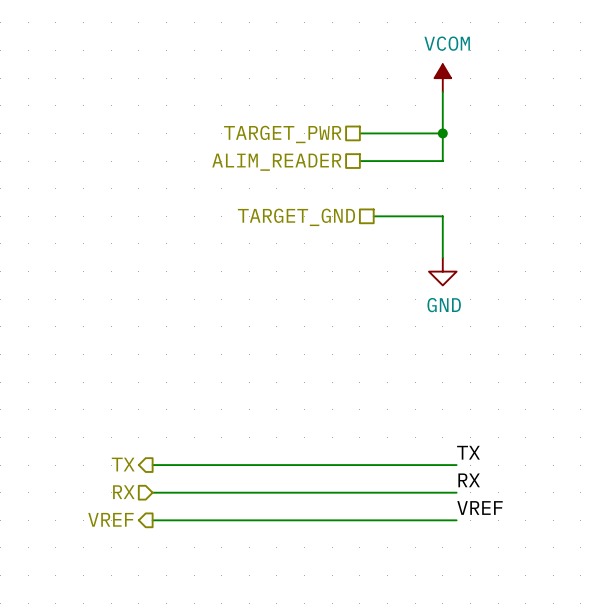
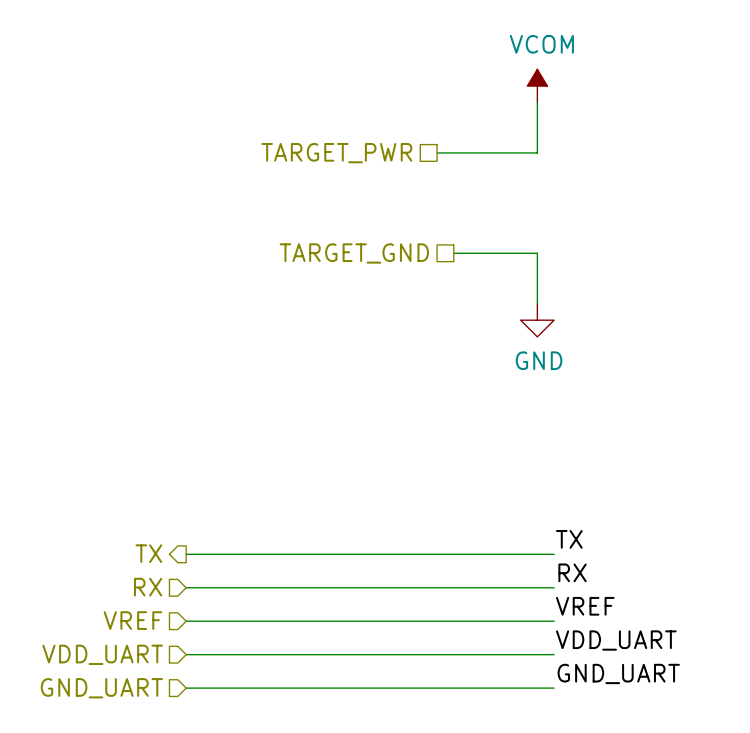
wire: (442, 133) (442, 161) (359, 161) -> none
junction: (442, 133) -> none
hierarchical label: ALIM_READER (276, 162) -> none
hierarchical label shape: output (110, 519) -> input (132, 620)
label: none -> VDD_UART (616, 640)
wire: none -> (186, 654) (554, 654)
hierarchical label: none -> VDD_UART (102, 654)
label: none -> GND_UART (618, 673)
wire: none -> (186, 688) (554, 688)
hierarchical label: none -> GND_UART (101, 688)

